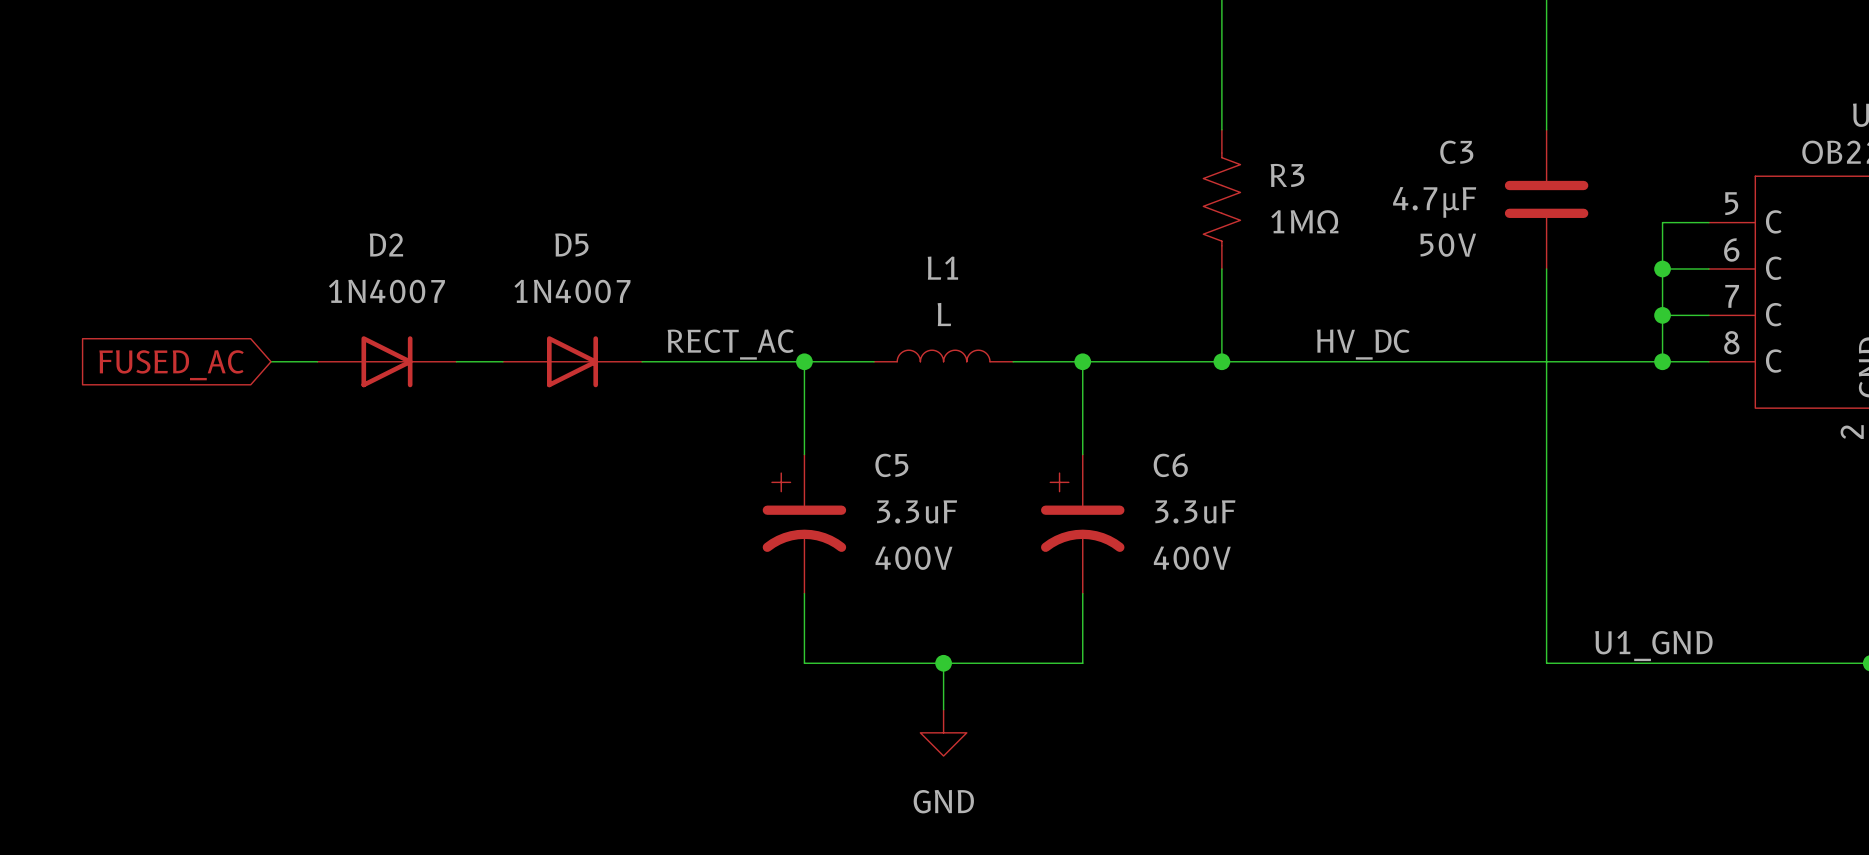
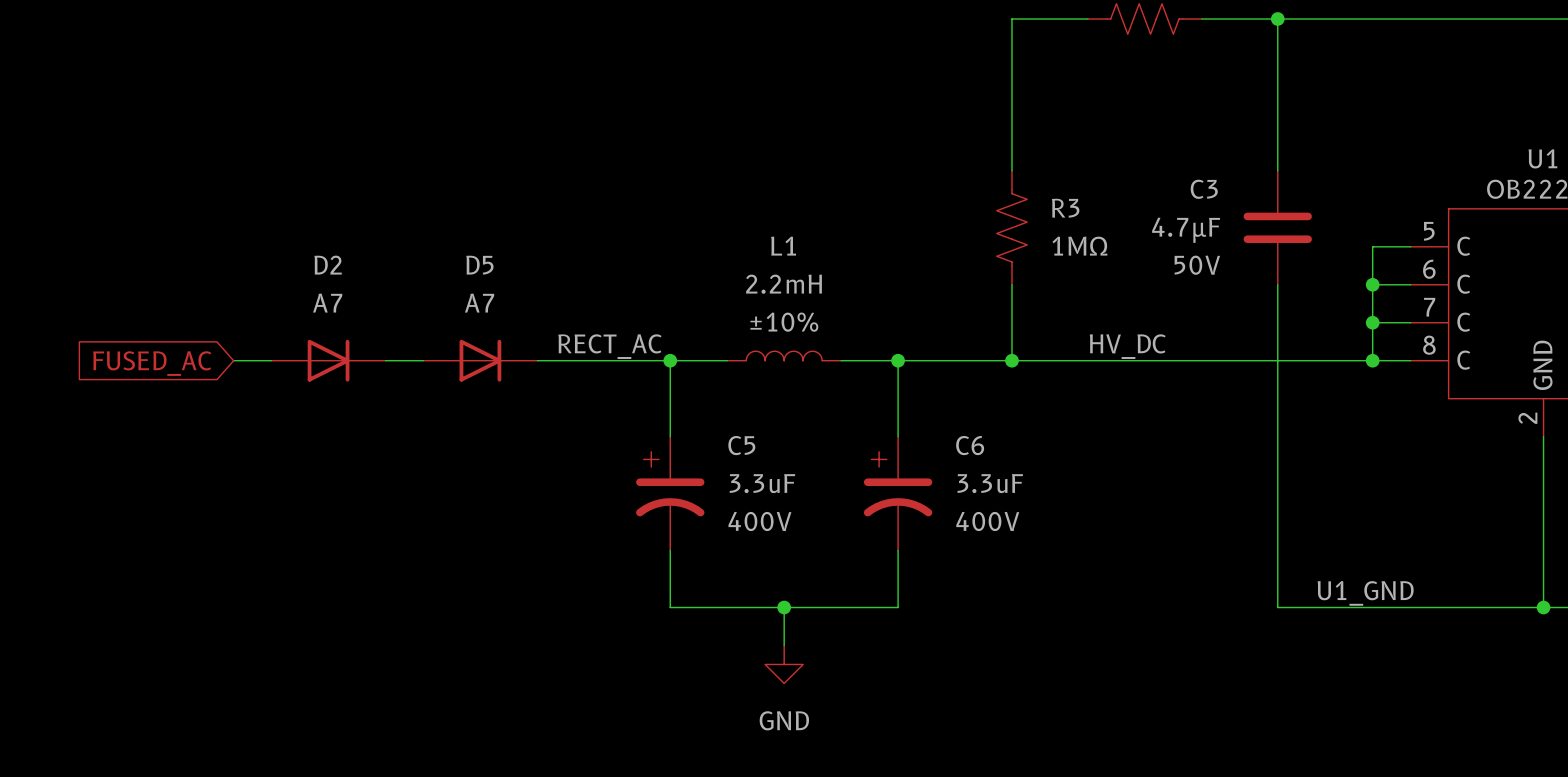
L1 name position: L1 (942, 268) -> L1 (783, 246)
D2 value: 1N4007 (386, 291) -> A7 (327, 303)
D5 value: 1N4007 (572, 291) -> A7 (479, 303)
L1 text: none -> ±10% (784, 322)
L1 value: L (944, 314) -> 2.2mH (784, 284)

